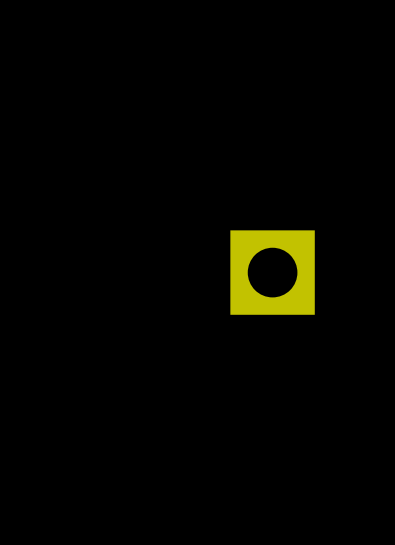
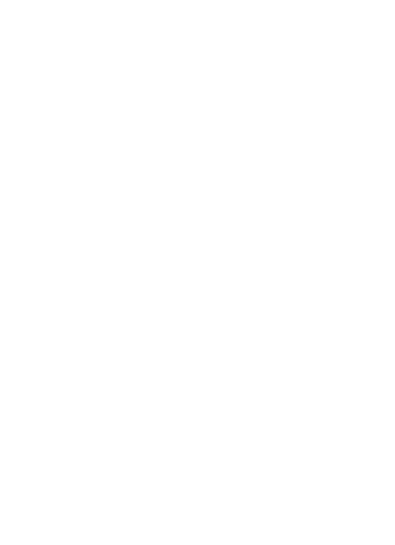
part: (272, 272) -> none

